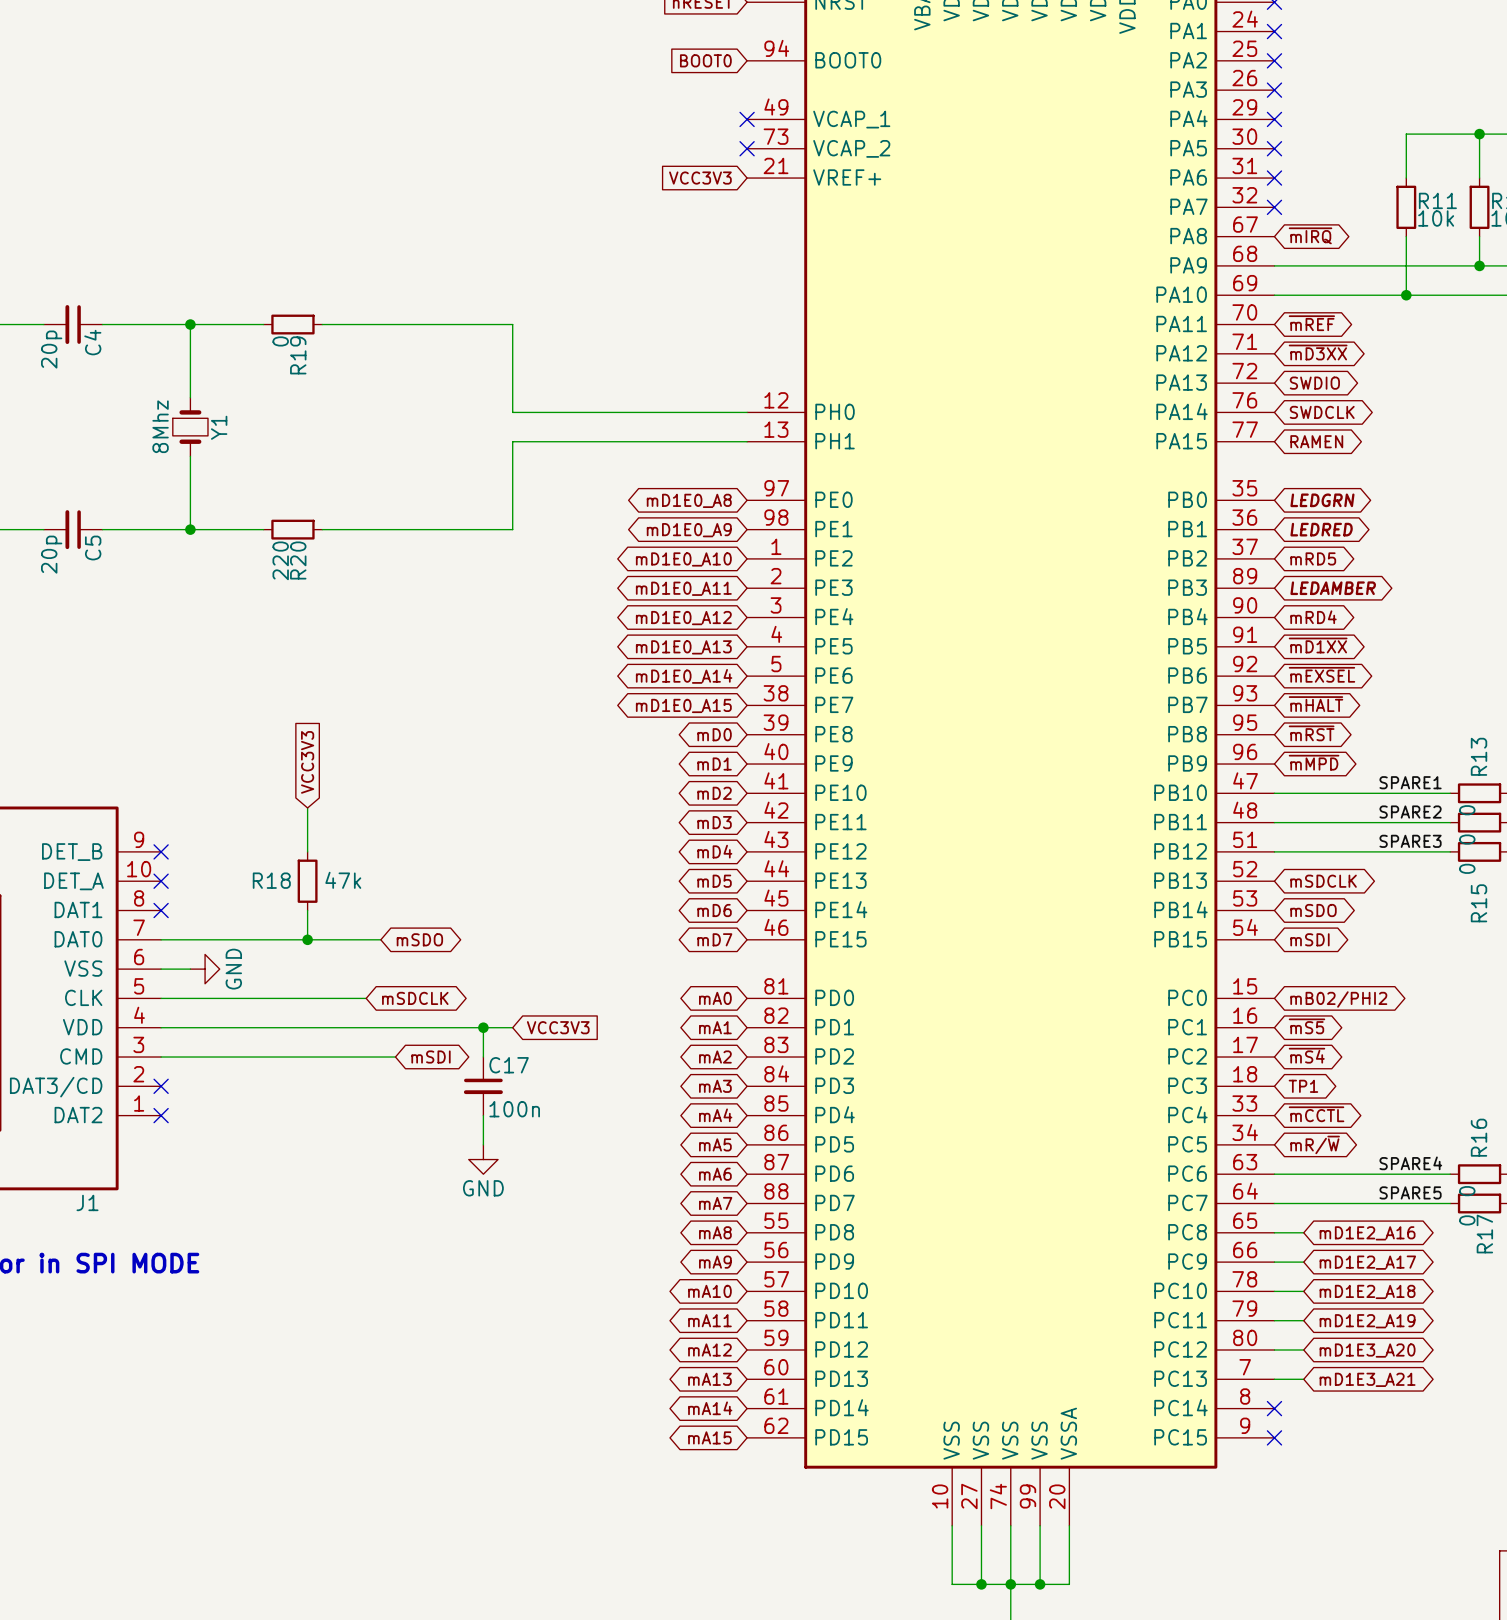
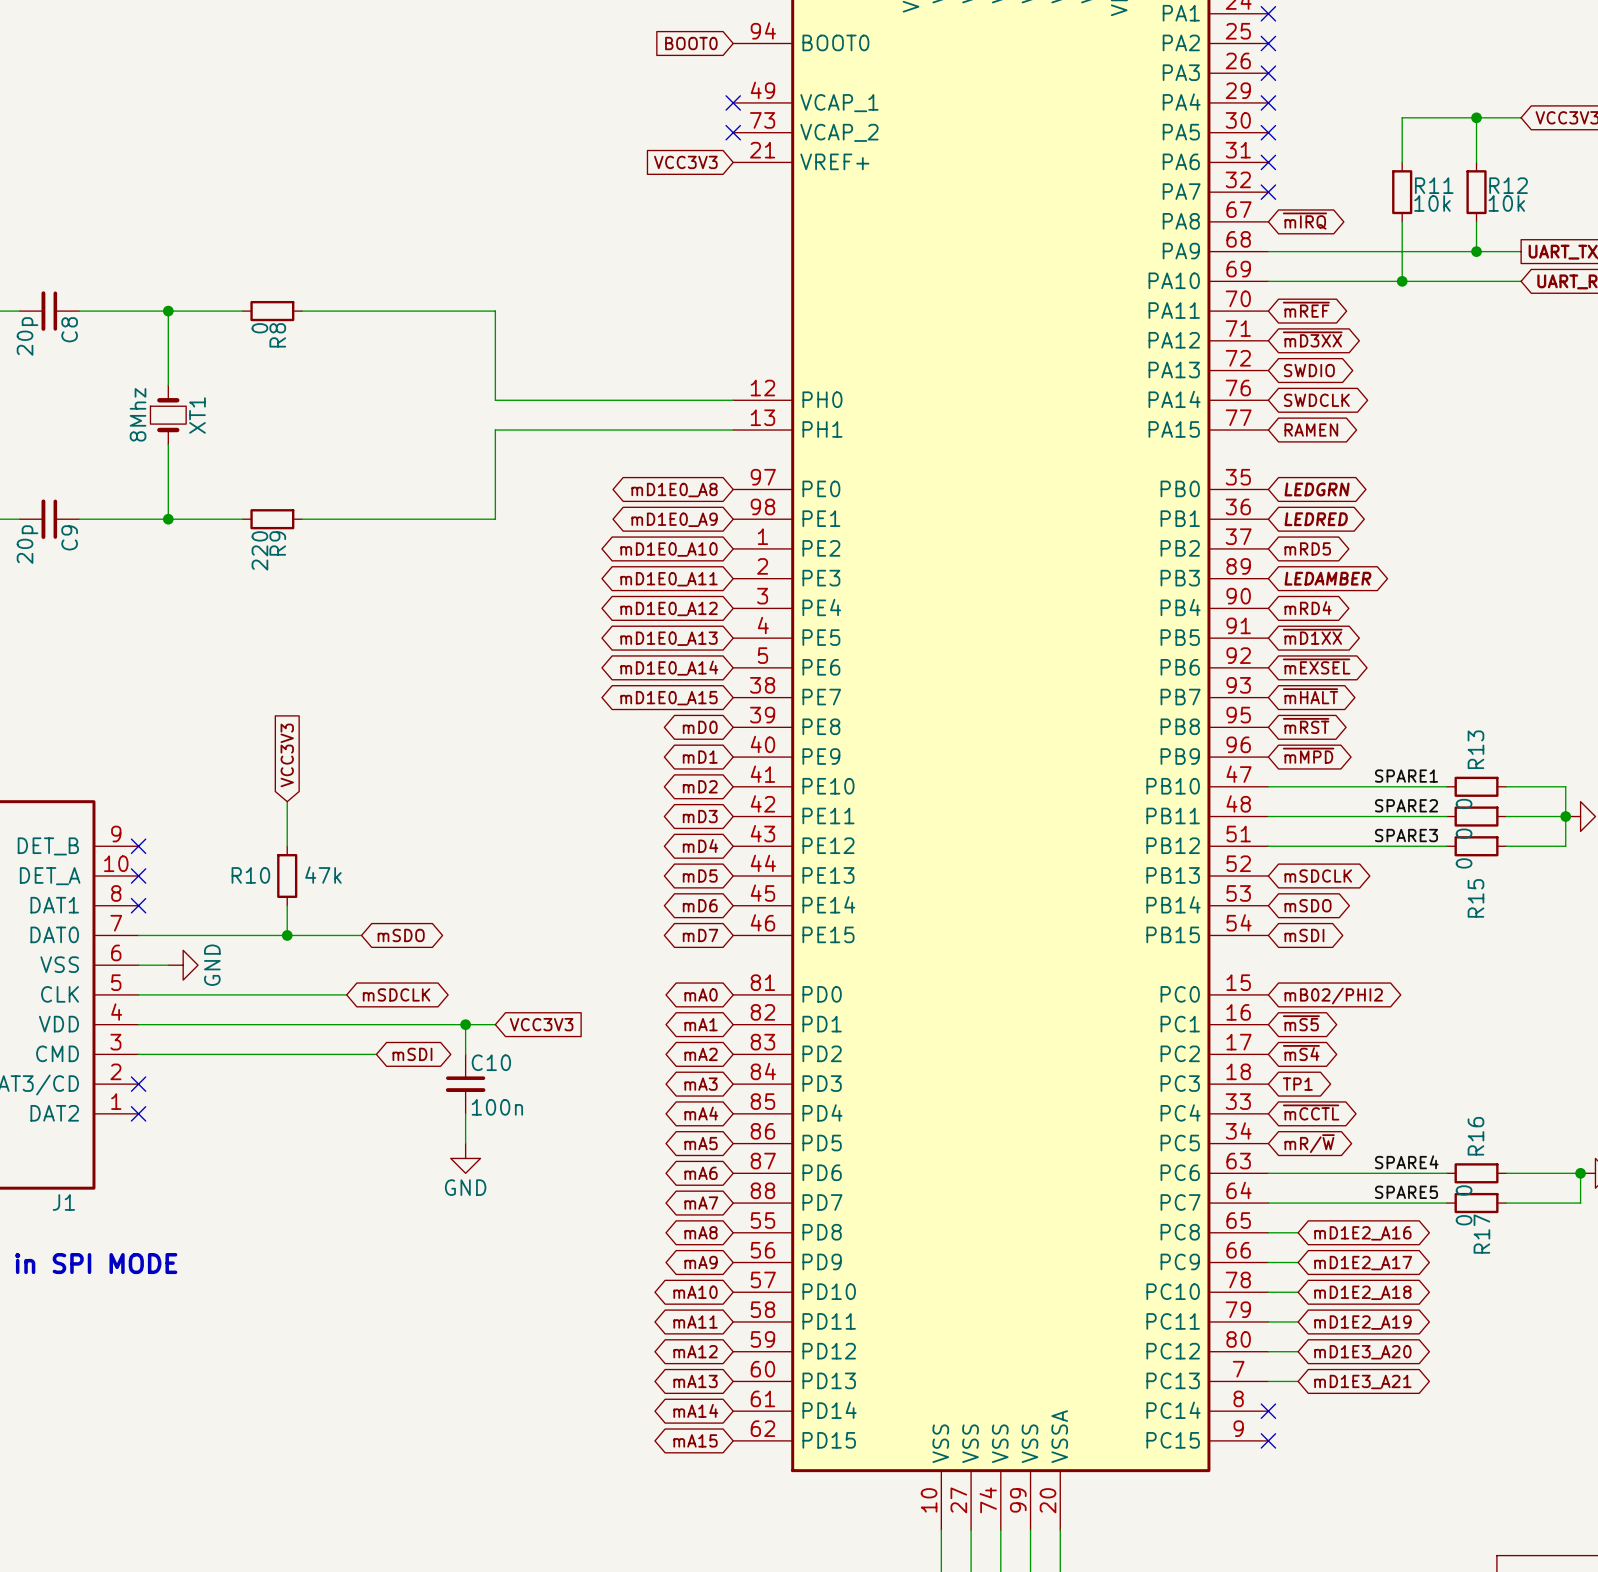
C4 name: C4 (92, 342) -> C8 (69, 329)
R19 name: R19 (298, 355) -> R8 (277, 335)
Y1 name: Y1 (219, 427) -> XT1 (197, 415)
C5 name: C5 (93, 548) -> C9 (69, 537)
R20 name: R20 (298, 560) -> R9 (277, 543)
R18 name: R18 (271, 880) -> R10 (250, 875)
C17 name: C17 (509, 1065) -> C10 (491, 1062)

